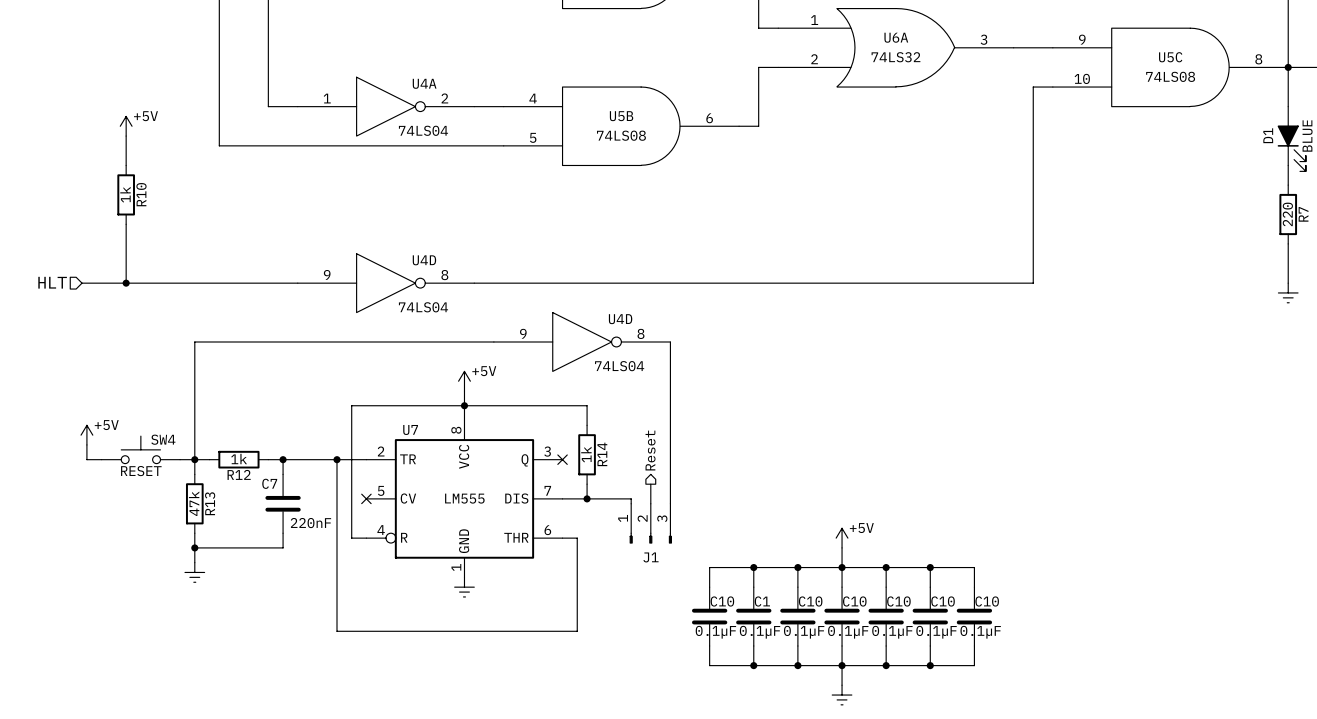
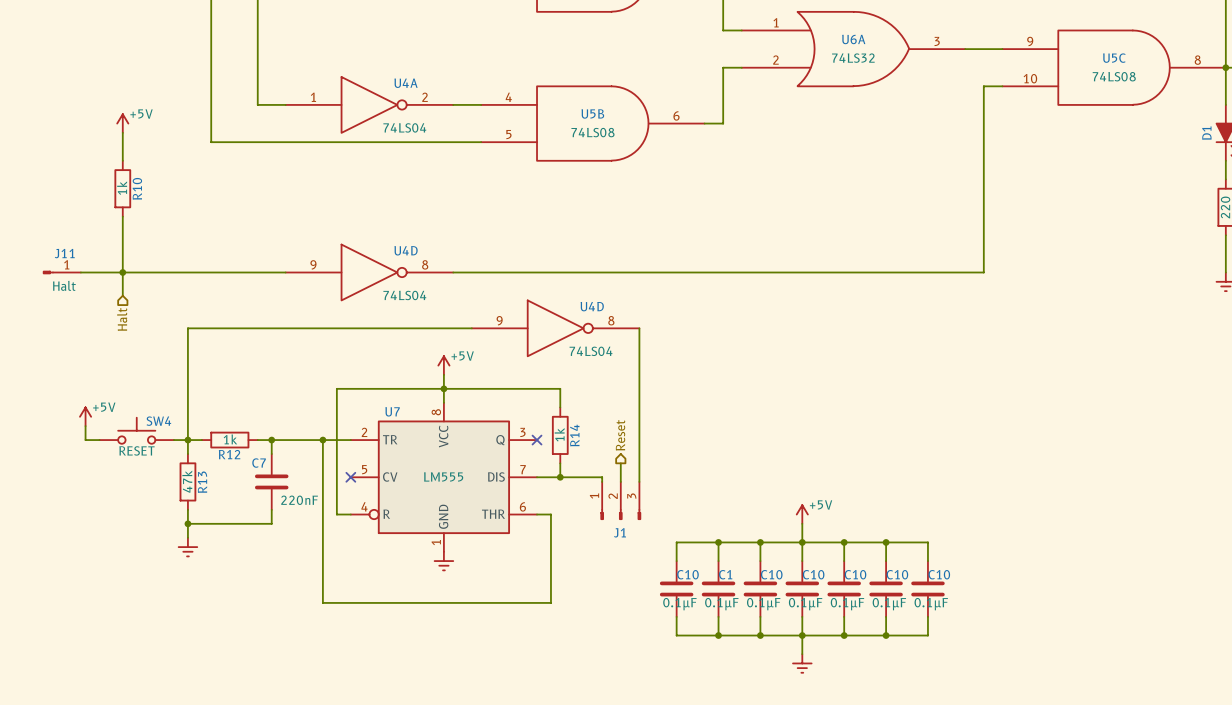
hierarchical label: HLT (52, 282) -> none
J11: none -> Halt (62, 272)
wire: none -> (122, 272) (122, 295)
hierarchical label: none -> Halt (122, 319)

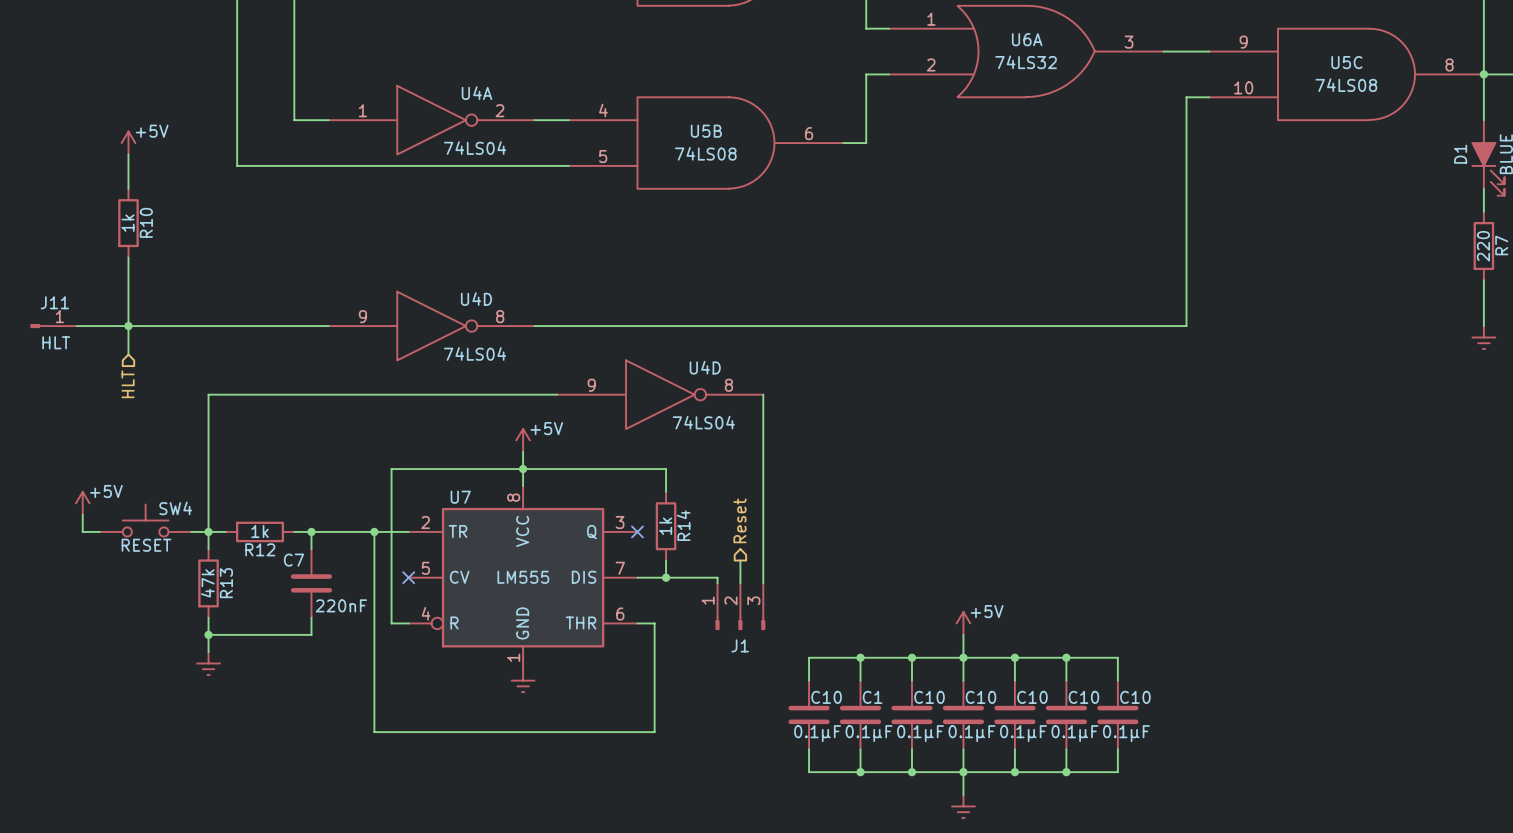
J11 value: Halt (64, 285) -> HLT (56, 342)
hierarchical label: Halt (122, 319) -> HLT (128, 384)

